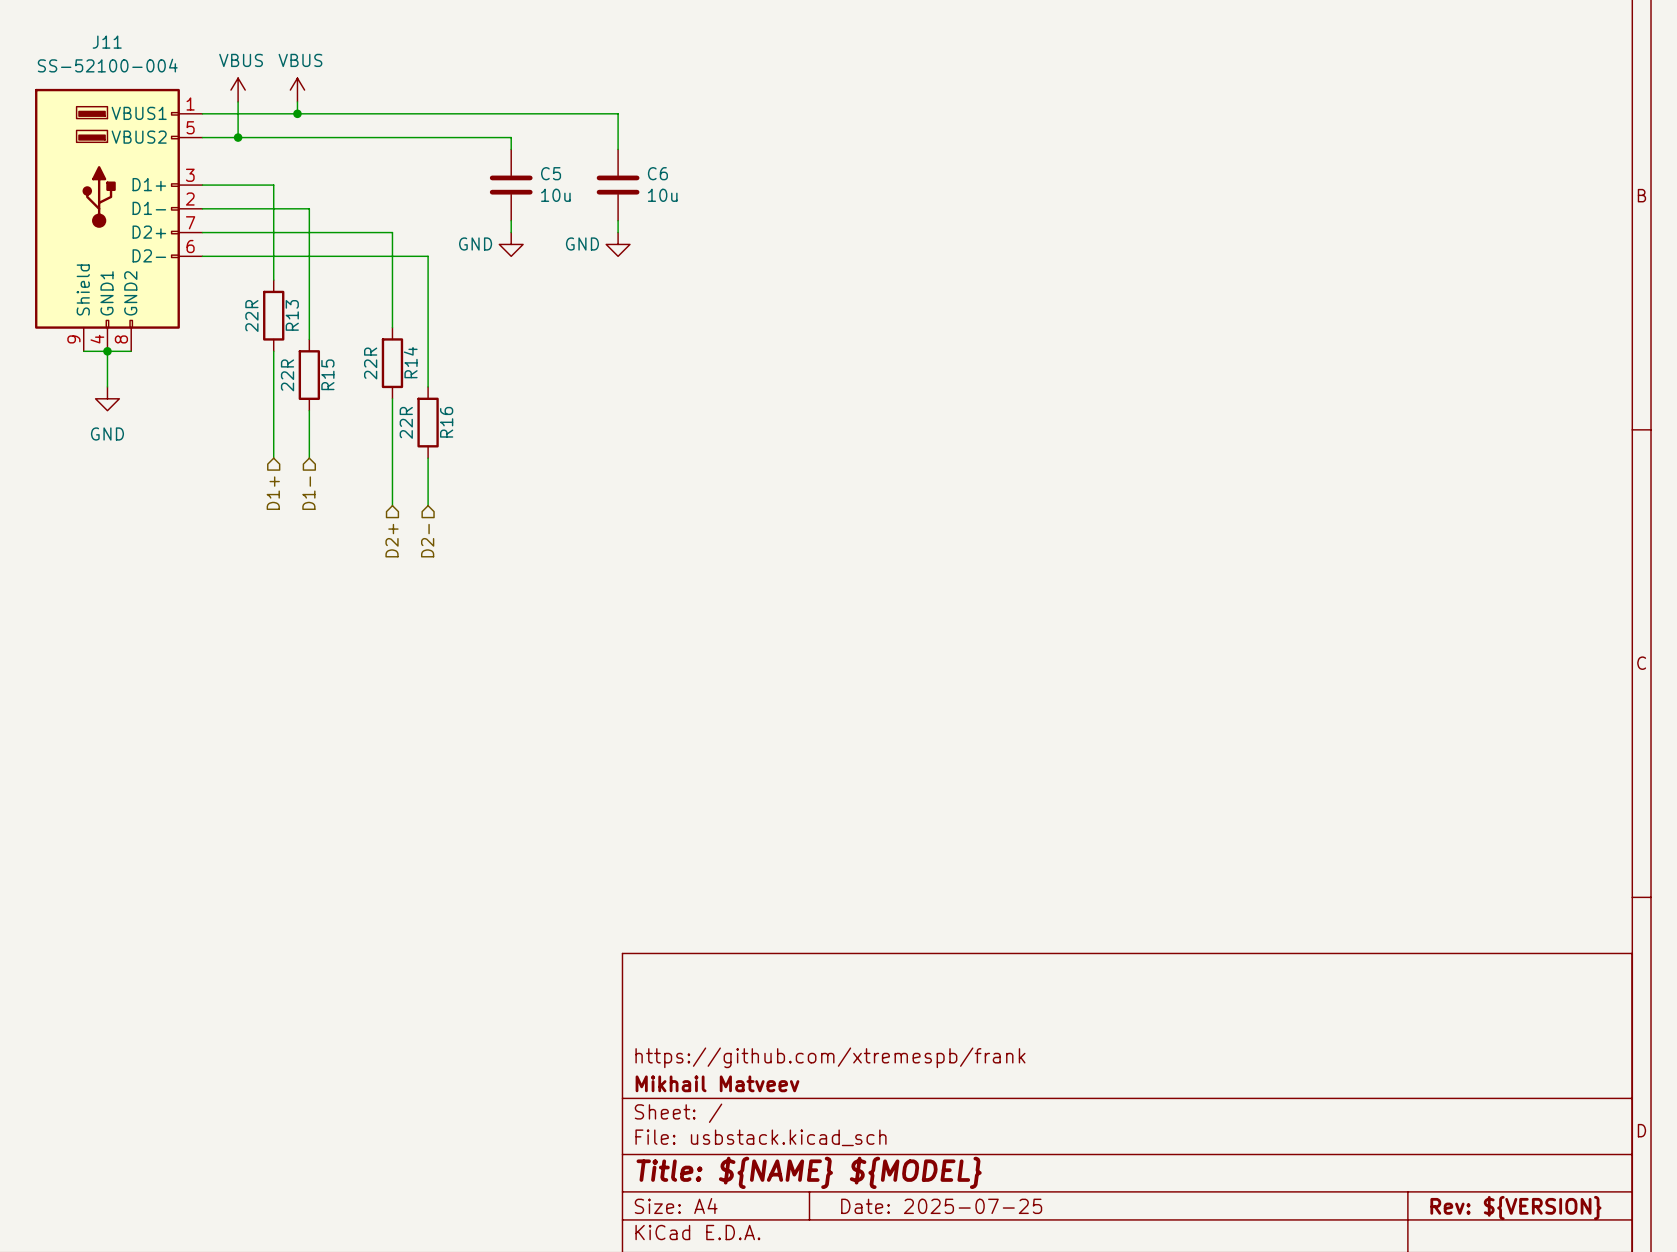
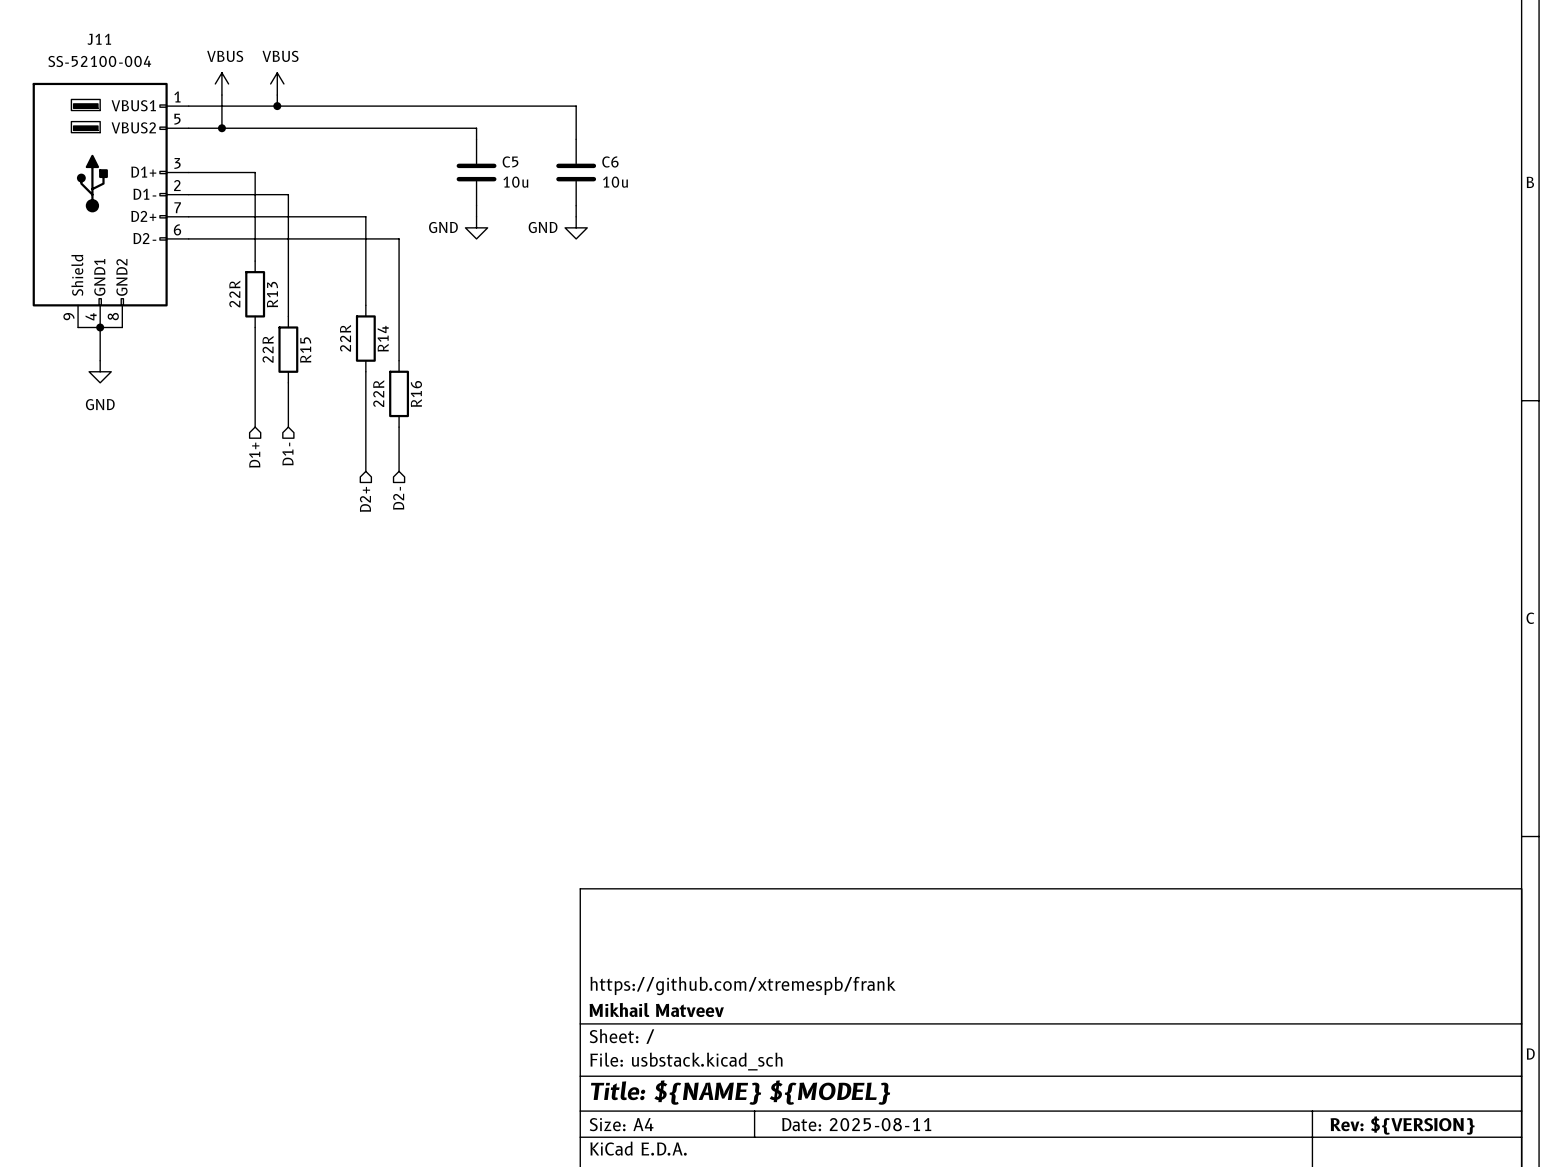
title block: Date: 2025-07-25 (941, 1206) -> Date: 2025-08-11 (856, 1124)

